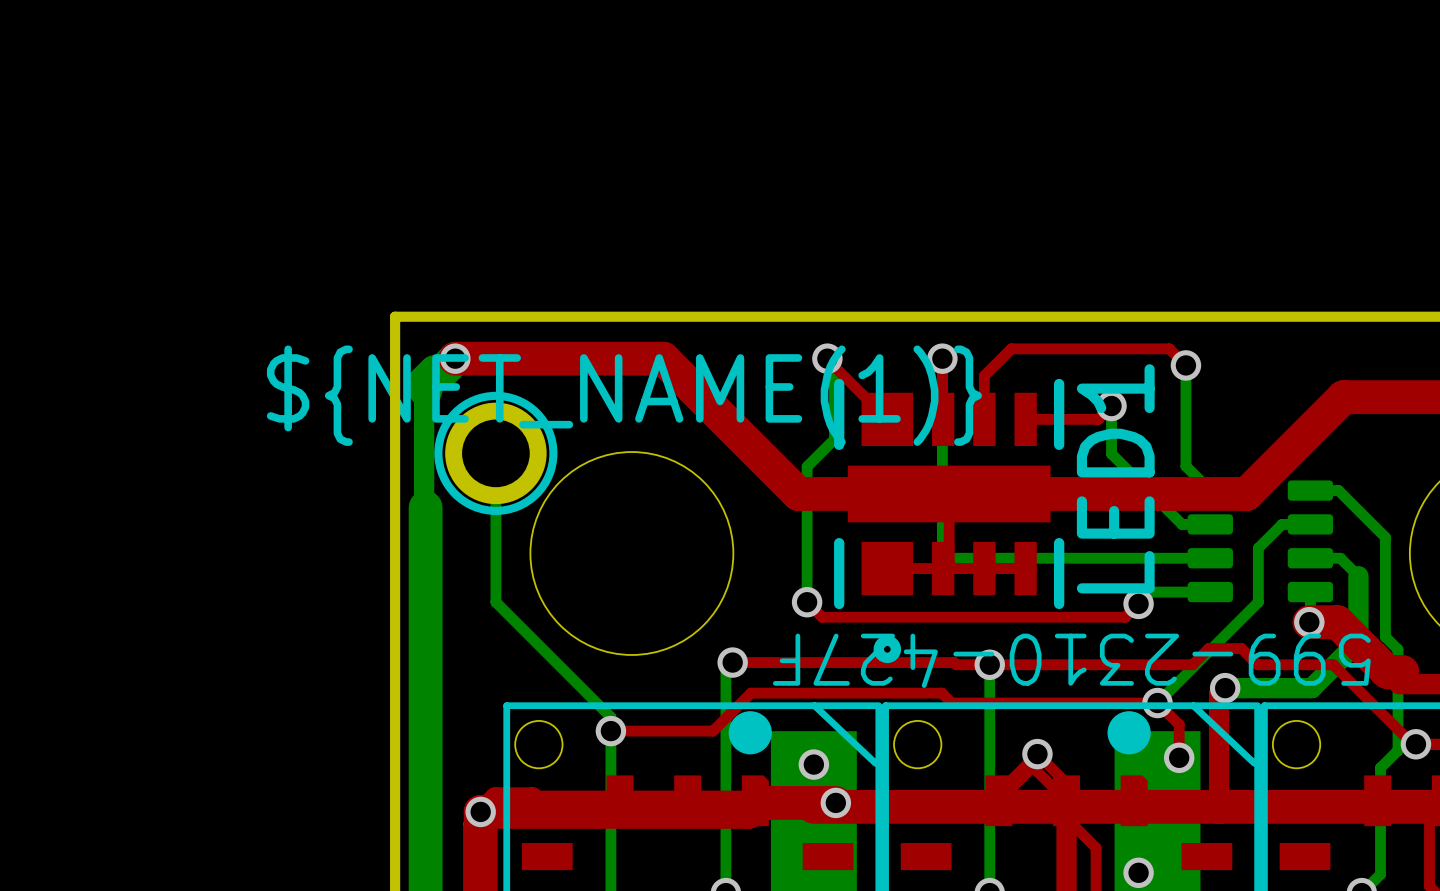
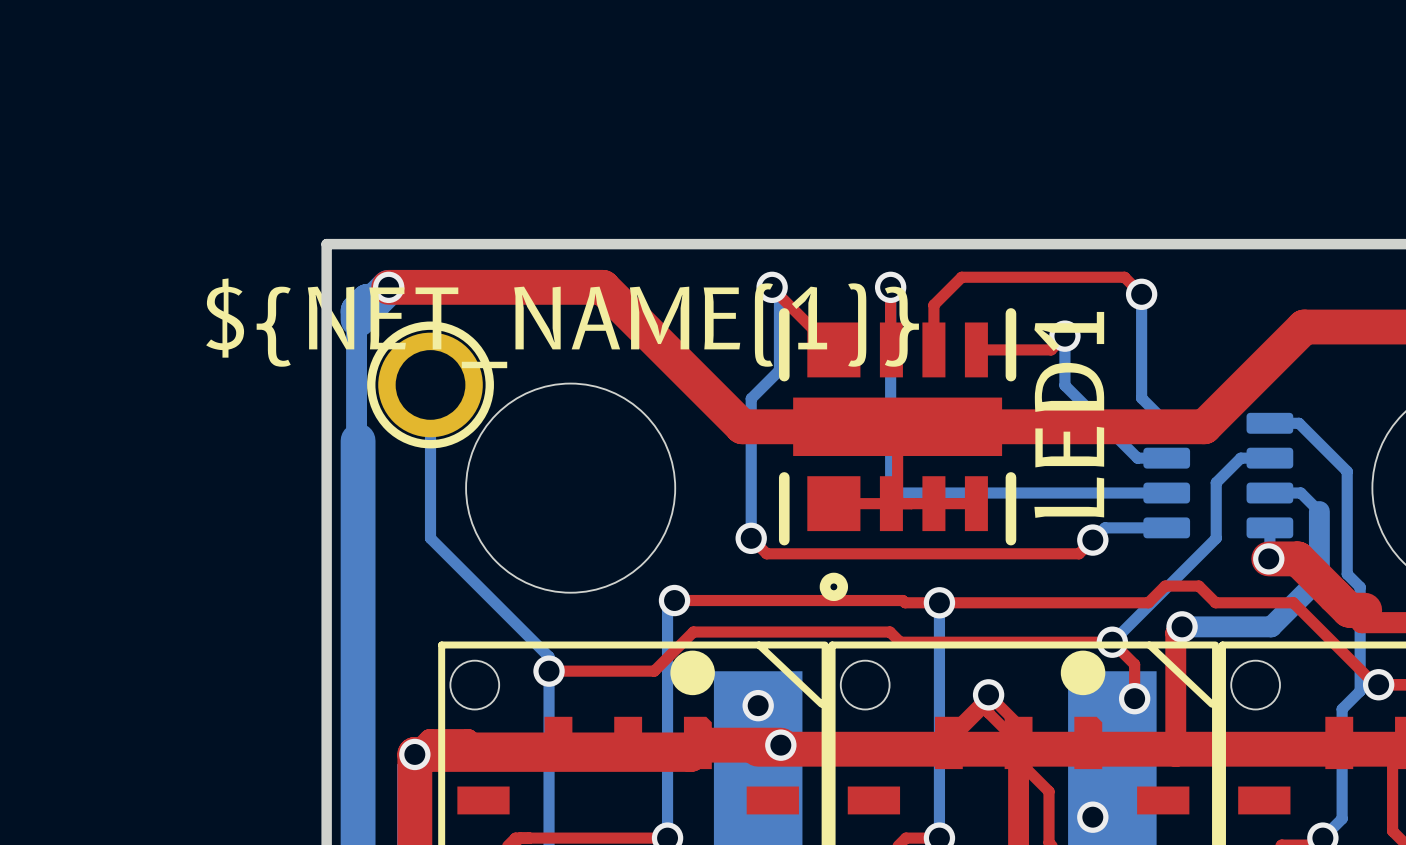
LED1 value: 599-2310-427F (1071, 660) -> none

